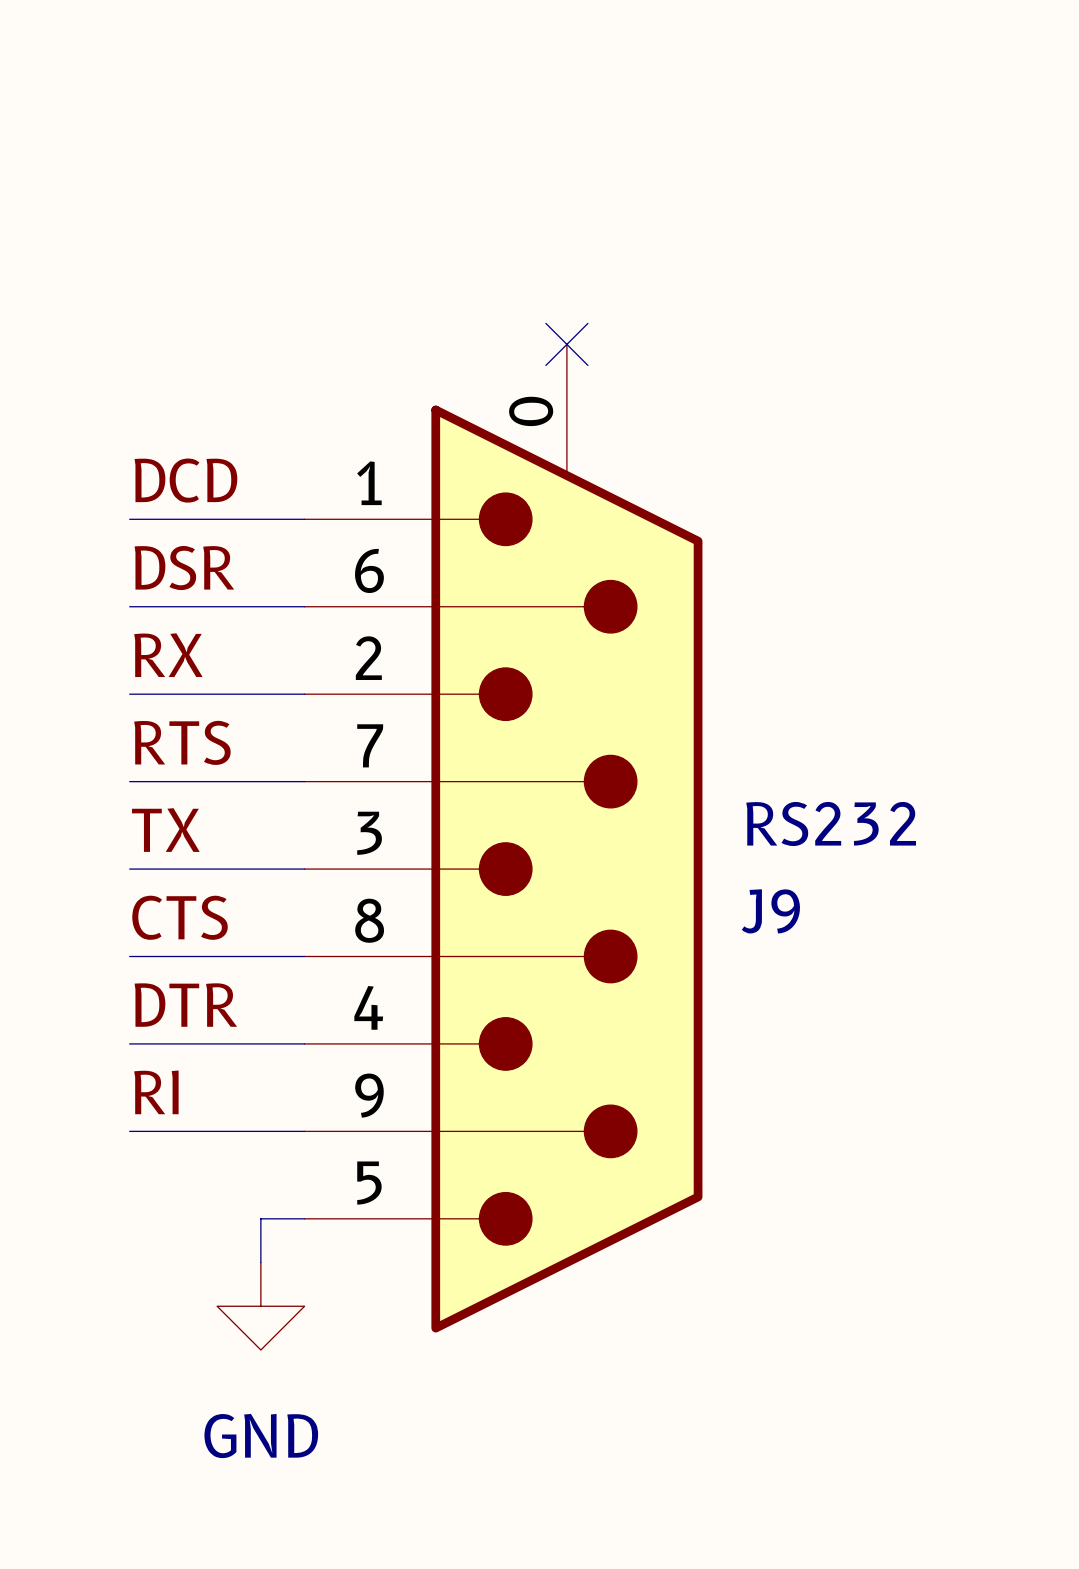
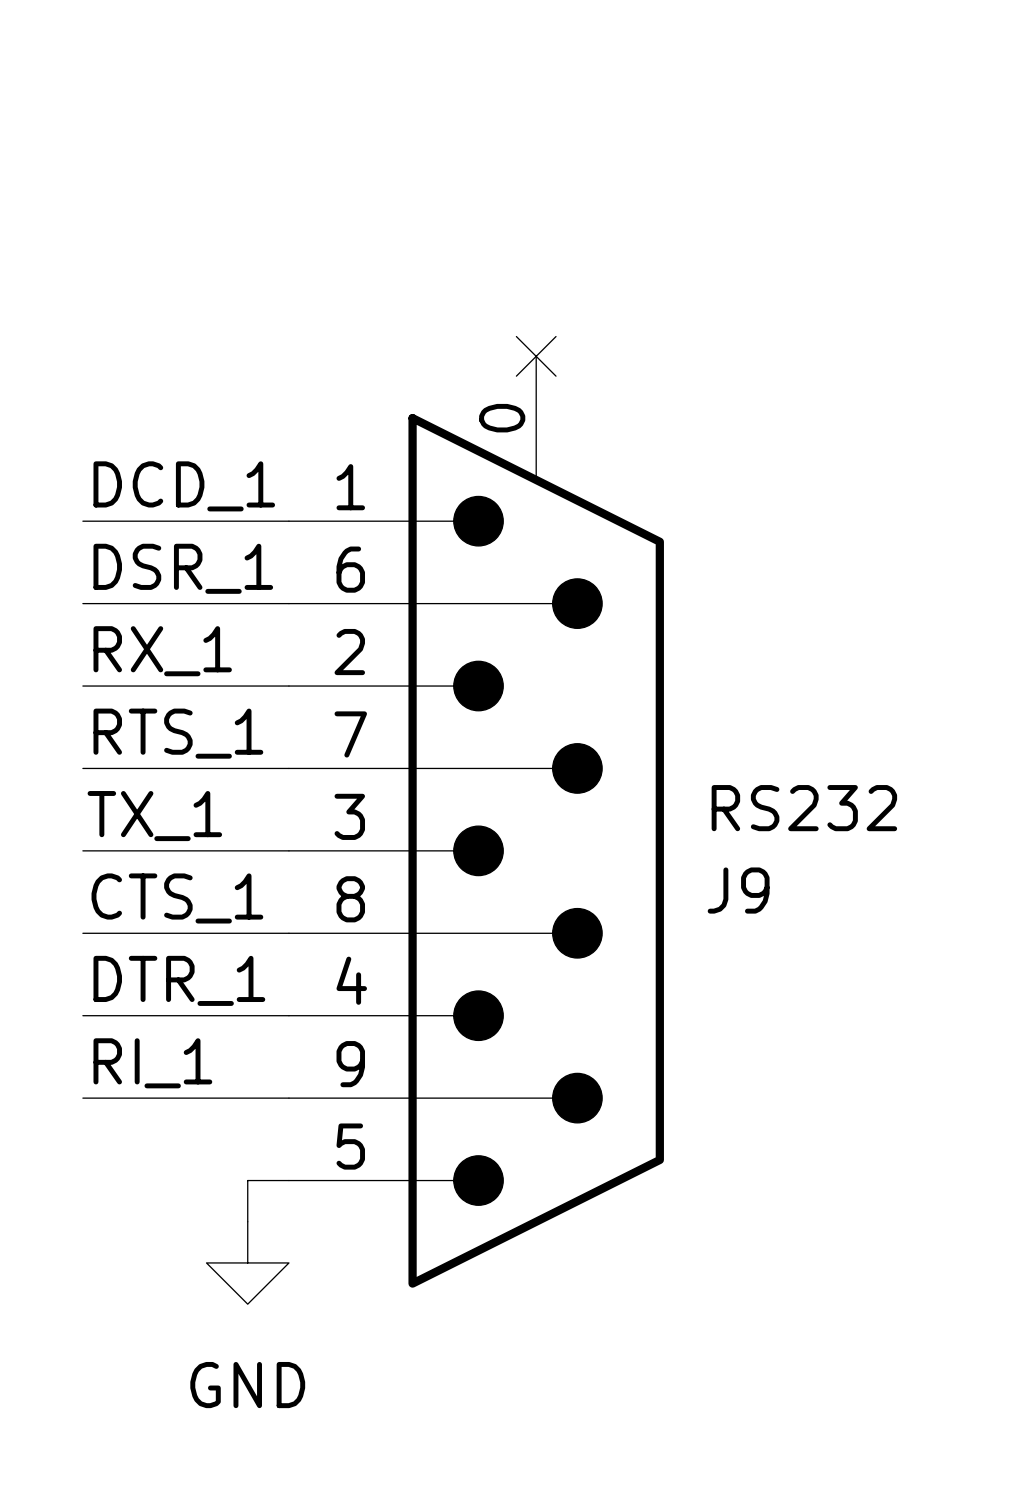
label: DCD (185, 480) -> DCD_1 (184, 486)
wire: none -> (82, 521) (124, 521)
label: DSR (184, 568) -> DSR_1 (183, 568)
wire: none -> (82, 603) (124, 603)
label: RX (168, 655) -> RX_1 (162, 651)
wire: none -> (82, 686) (124, 686)
label: RTS (182, 742) -> RTS_1 (178, 733)
wire: none -> (82, 768) (124, 768)
label: TX (165, 830) -> TX_1 (154, 816)
wire: none -> (82, 850) (124, 850)
label: CTS (180, 917) -> CTS_1 (177, 898)
wire: none -> (82, 933) (124, 933)
label: DTR (185, 1005) -> DTR_1 (179, 980)
wire: none -> (82, 1015) (124, 1015)
label: RI (156, 1092) -> RI_1 (152, 1063)
wire: none -> (82, 1098) (124, 1098)

